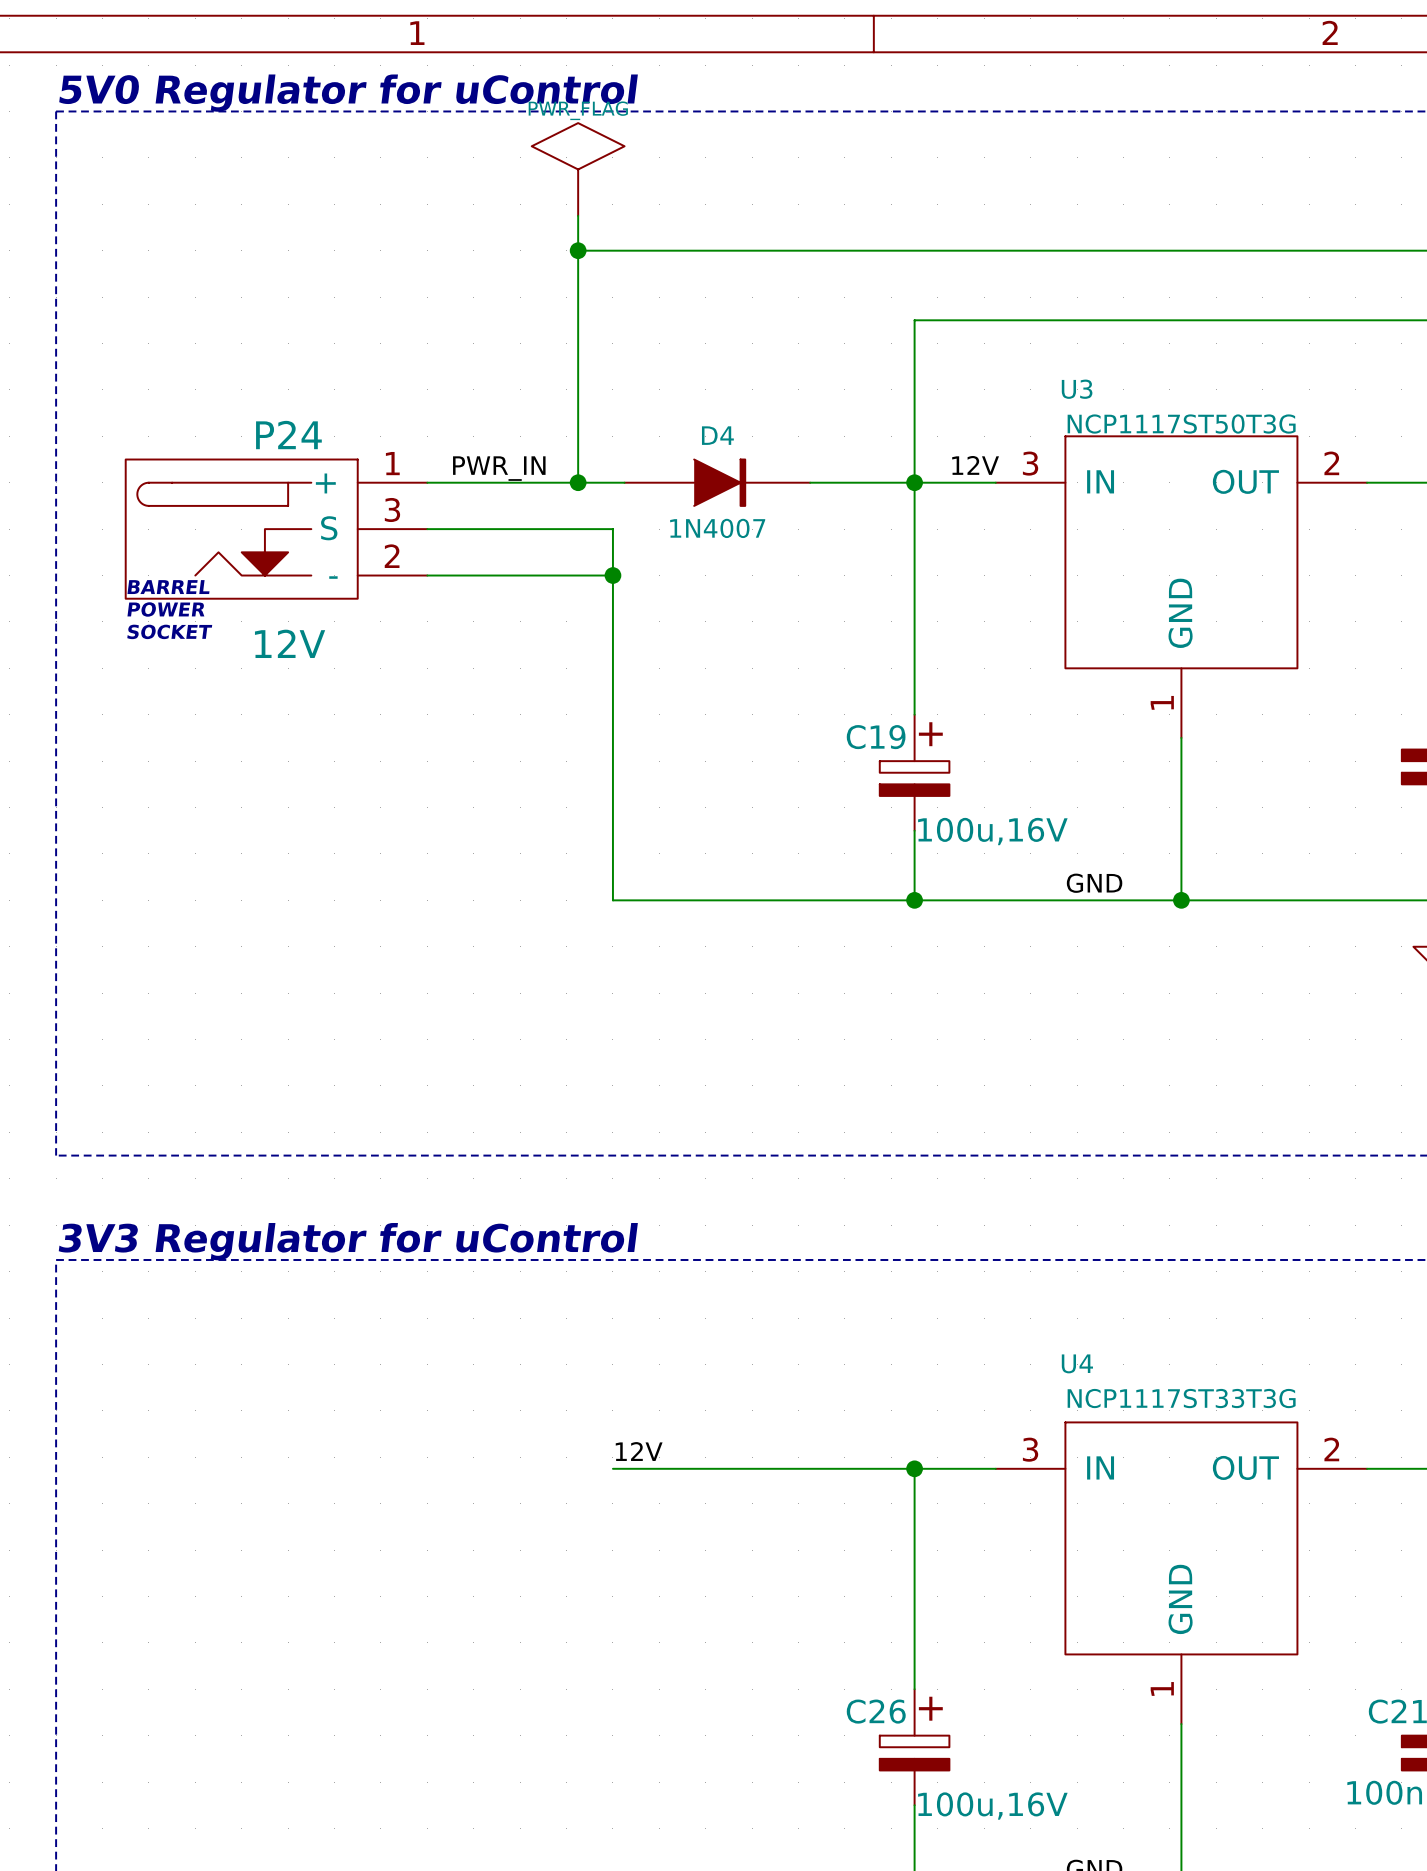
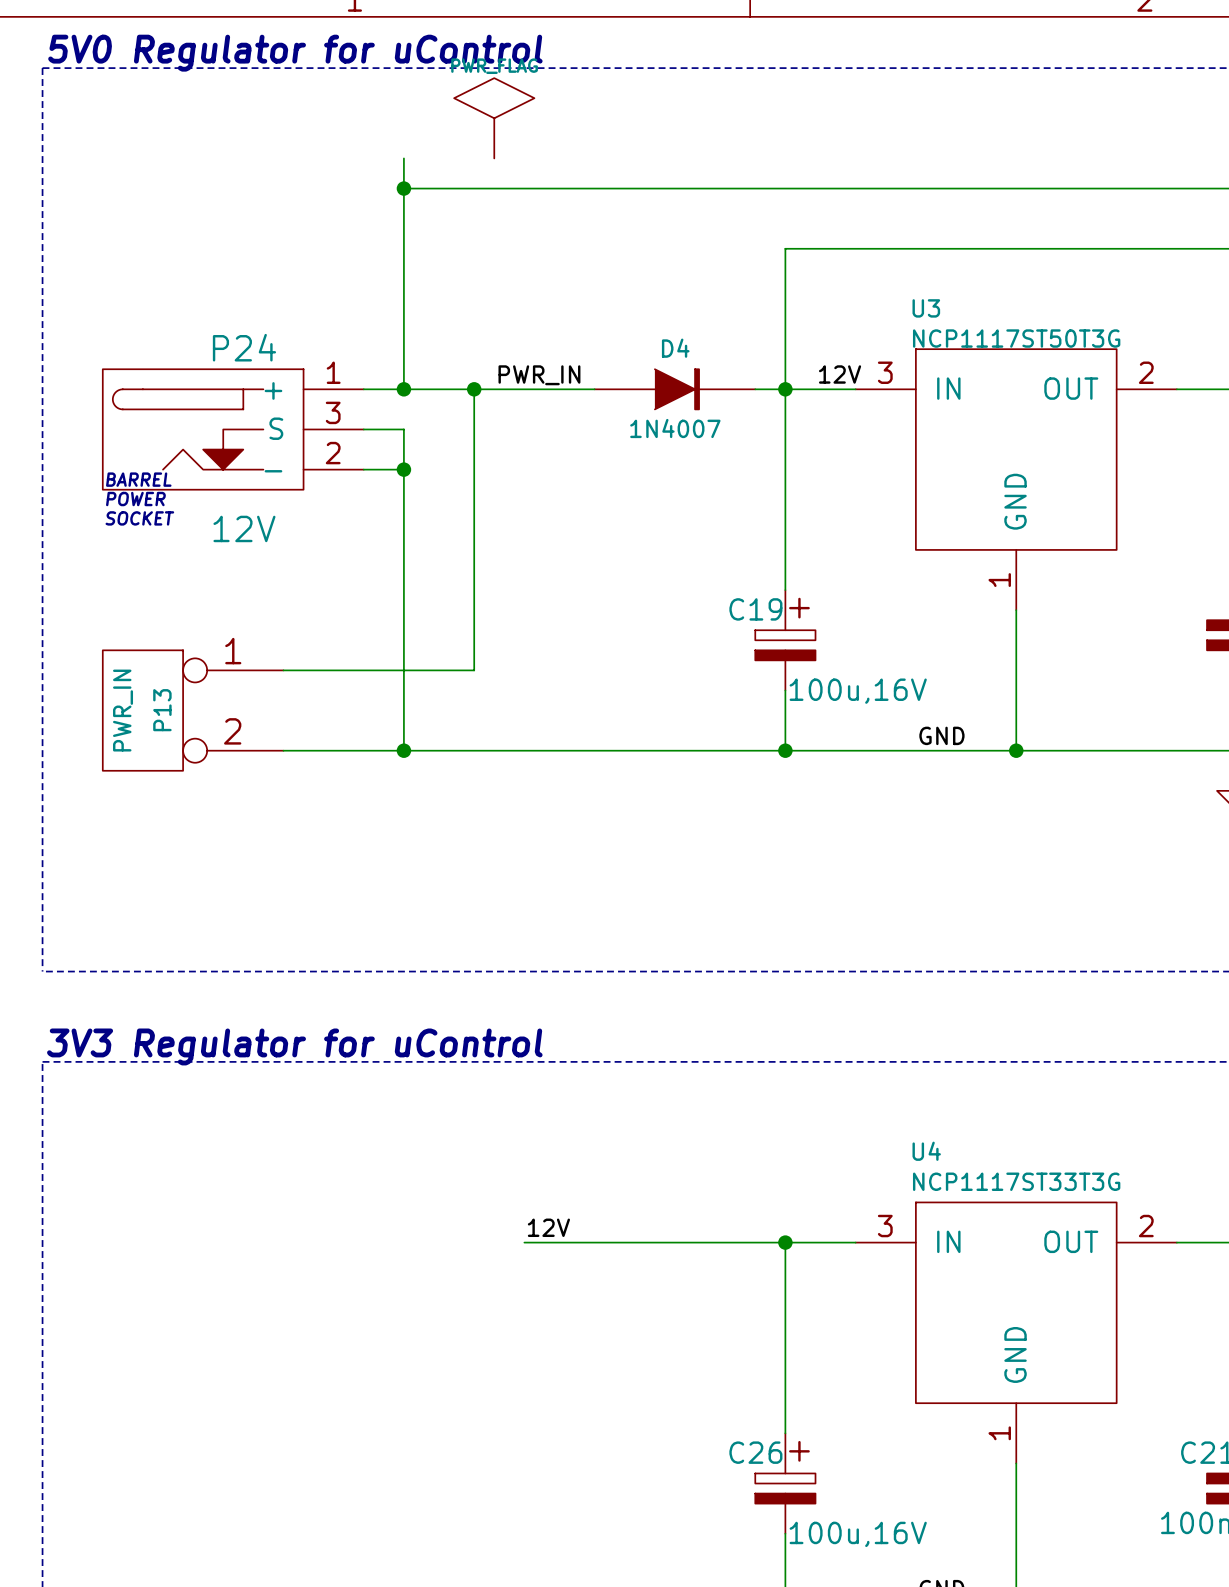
wire: (578, 215) (578, 482) -> (403, 158) (403, 389)
wire: none -> (403, 188) (494, 188)
junction position: (578, 250) -> (403, 188)
label position: PWR_IN (499, 468) -> PWR_IN (539, 375)
junction: none -> (403, 389)
wire: none -> (474, 389) (474, 670) (283, 670)
junction position: (578, 482) -> (474, 389)
D4 position: (717, 482) -> (674, 389)
wire: (473, 529) (612, 529) (612, 900) -> (403, 429) (403, 750)
wire: (473, 575) (612, 575) -> none
junction: none -> (403, 469)
junction: (612, 575) -> none
P13: none -> PWR_IN (193, 710)
wire: none -> (283, 750) (524, 750)
junction: none -> (403, 750)

